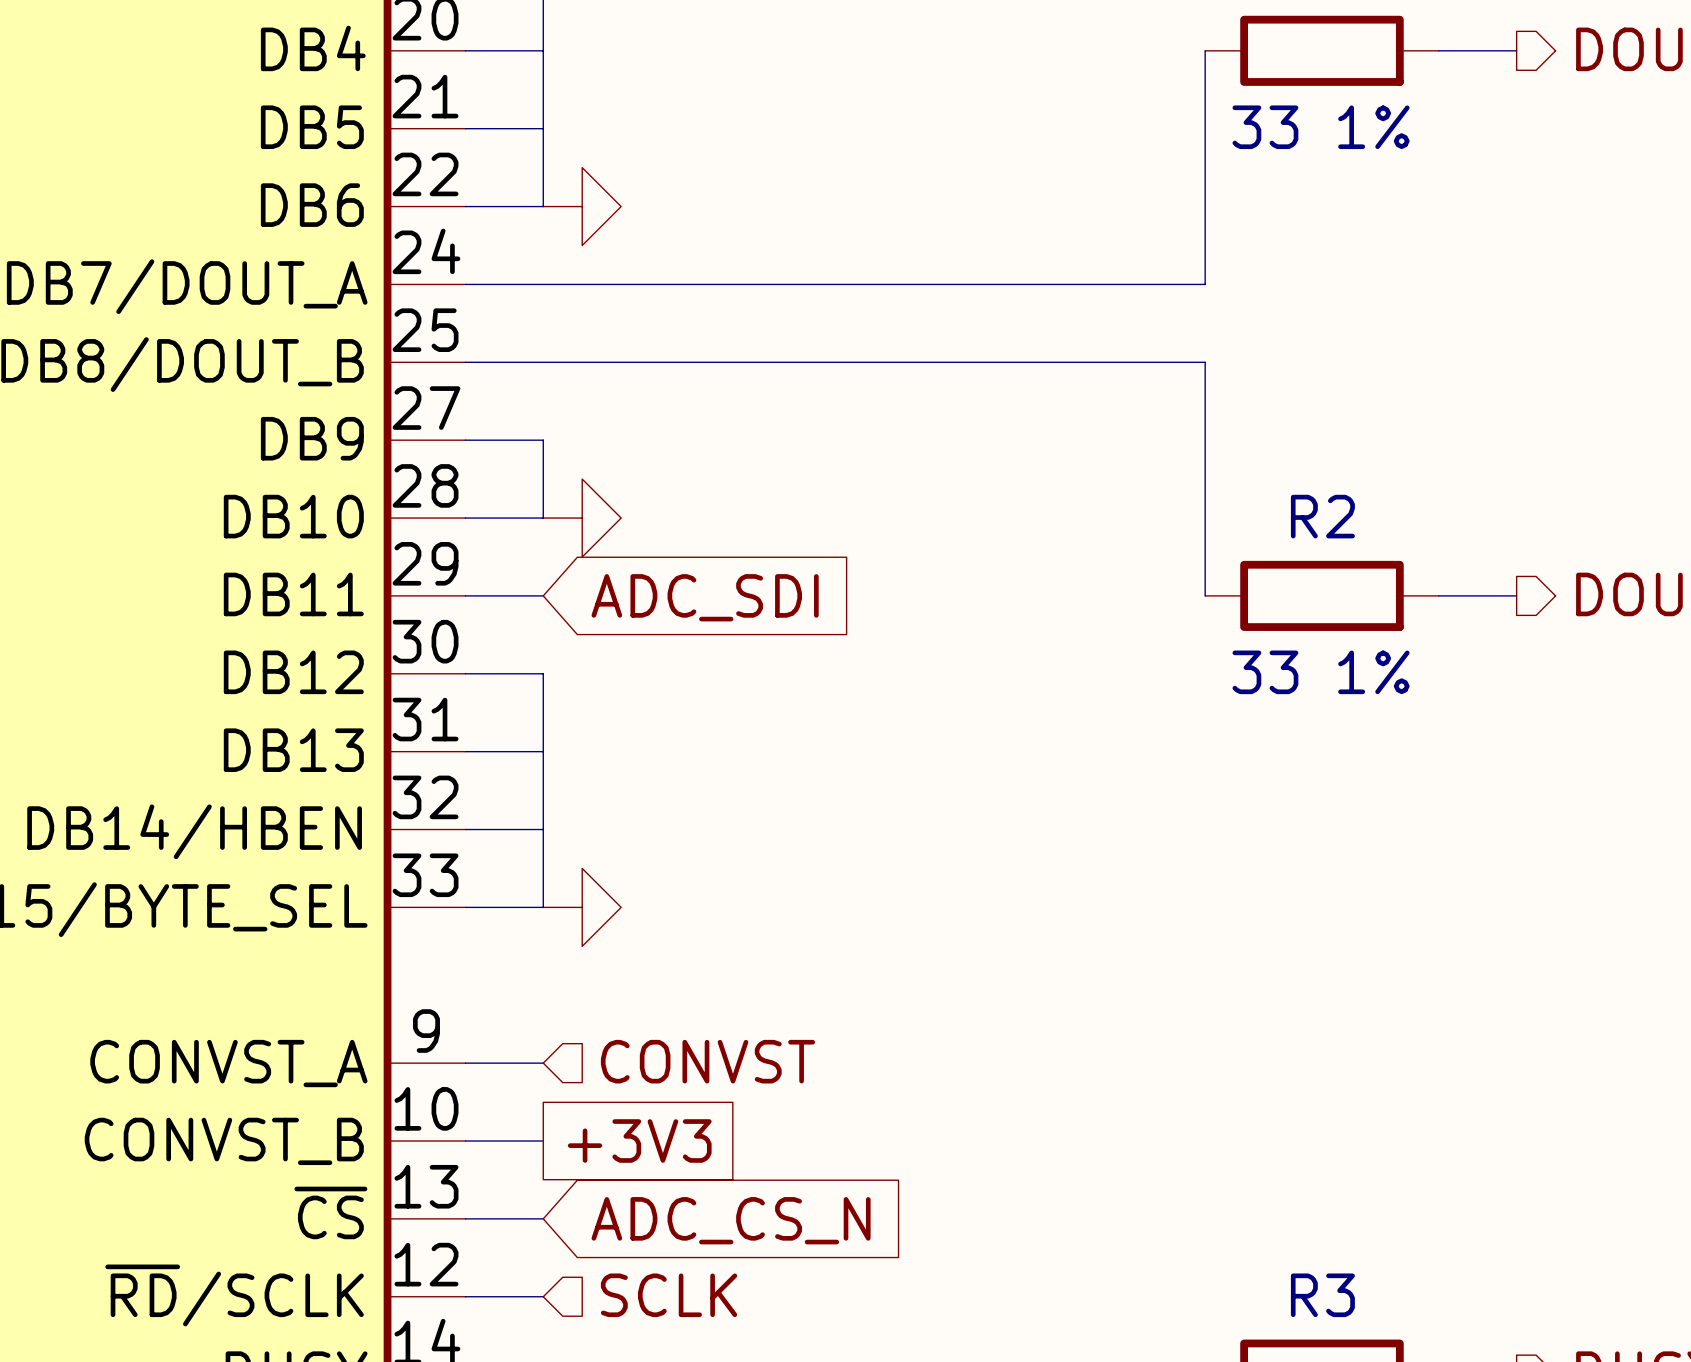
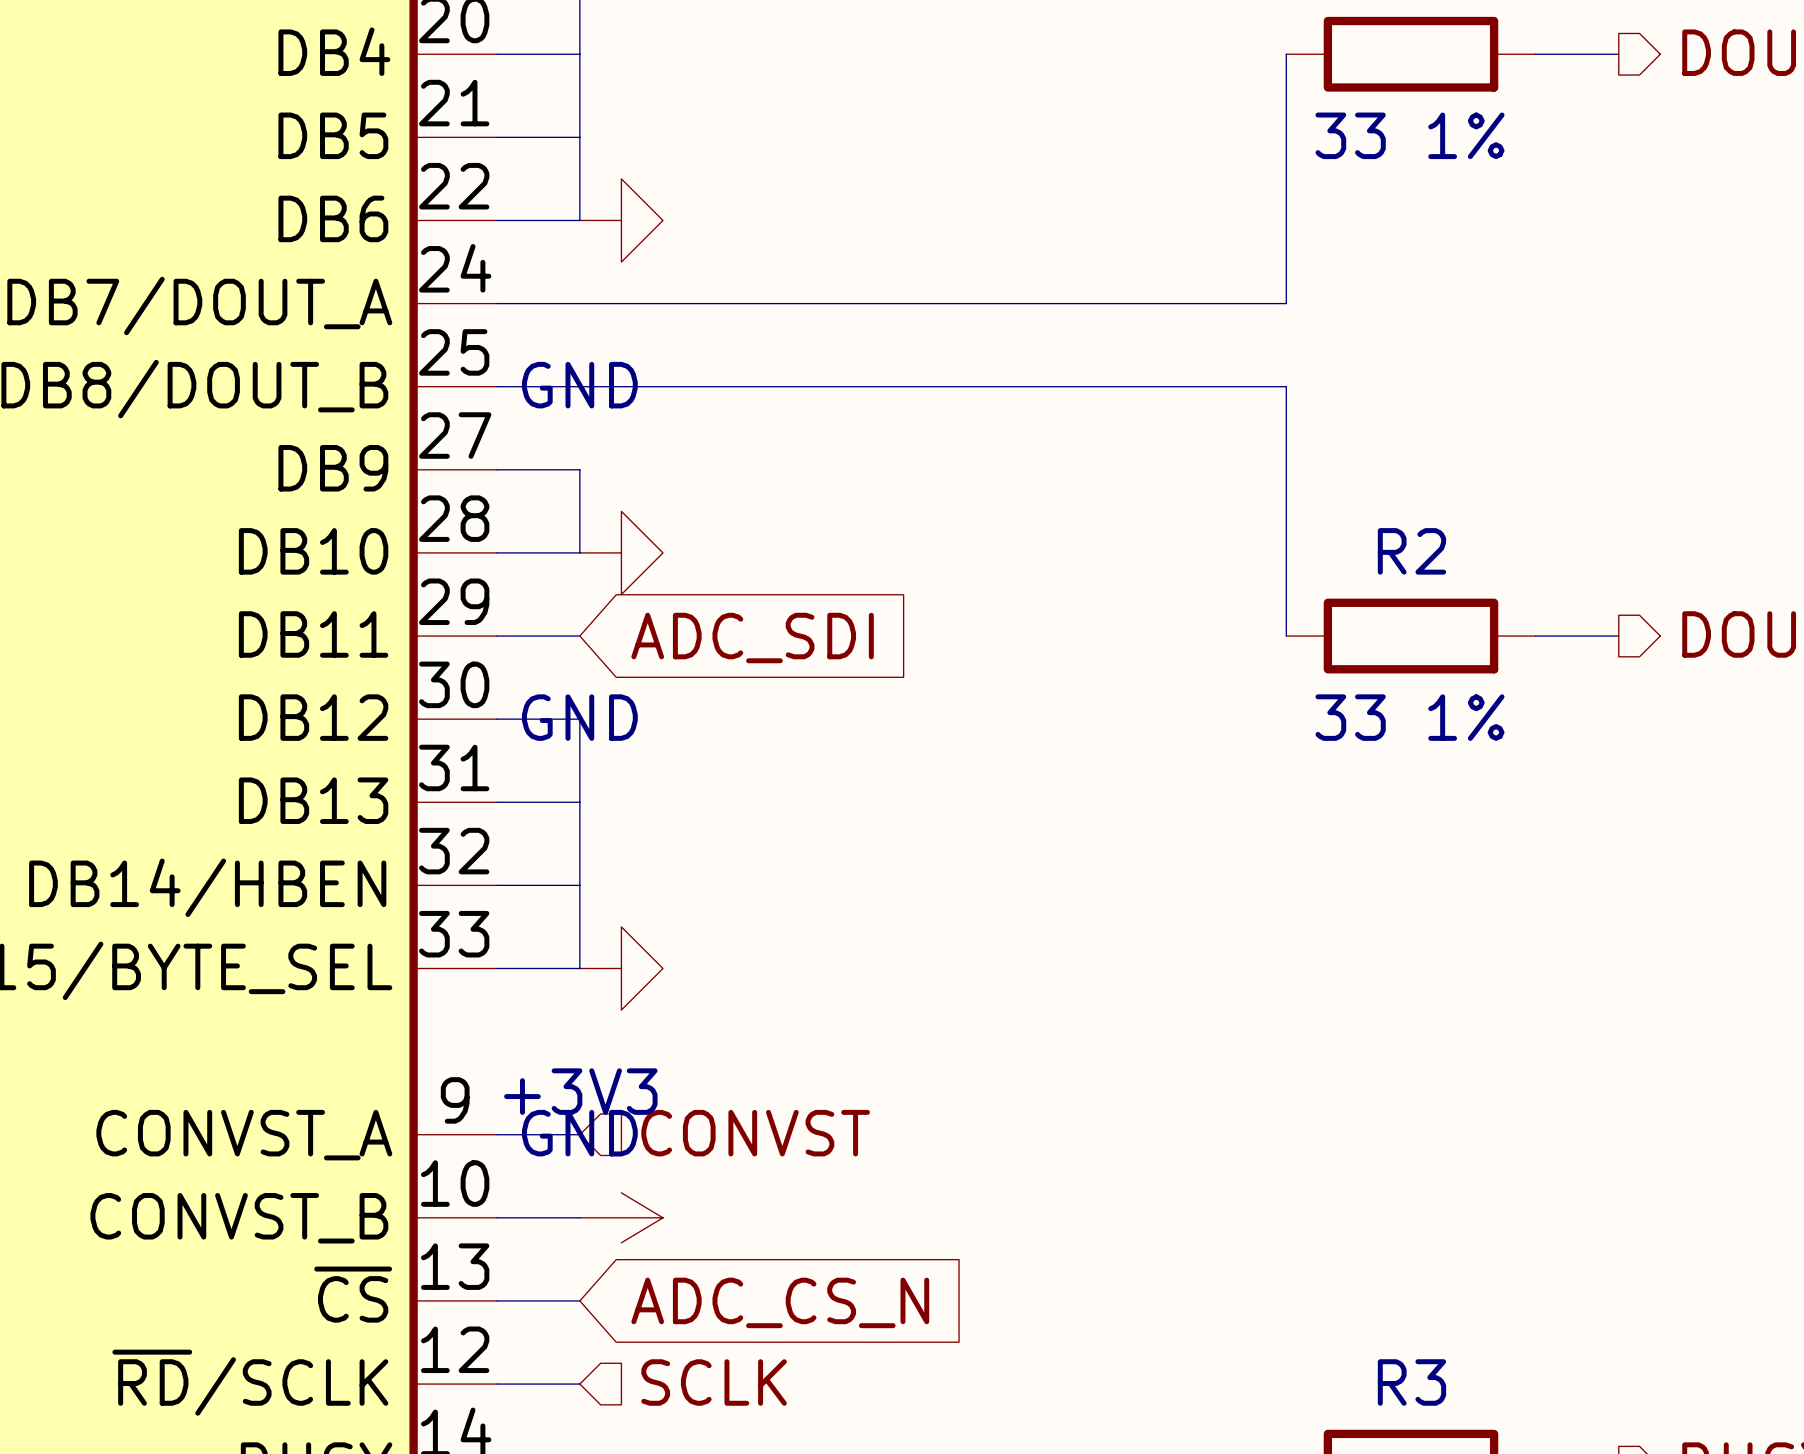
power symbol text: none -> GND (579, 385)
power symbol text: none -> GND (579, 717)
power symbol text: none -> GND (579, 1133)
power symbol: none -> +3V3 (621, 1217)
global label: +3V3 (639, 1141) -> none

